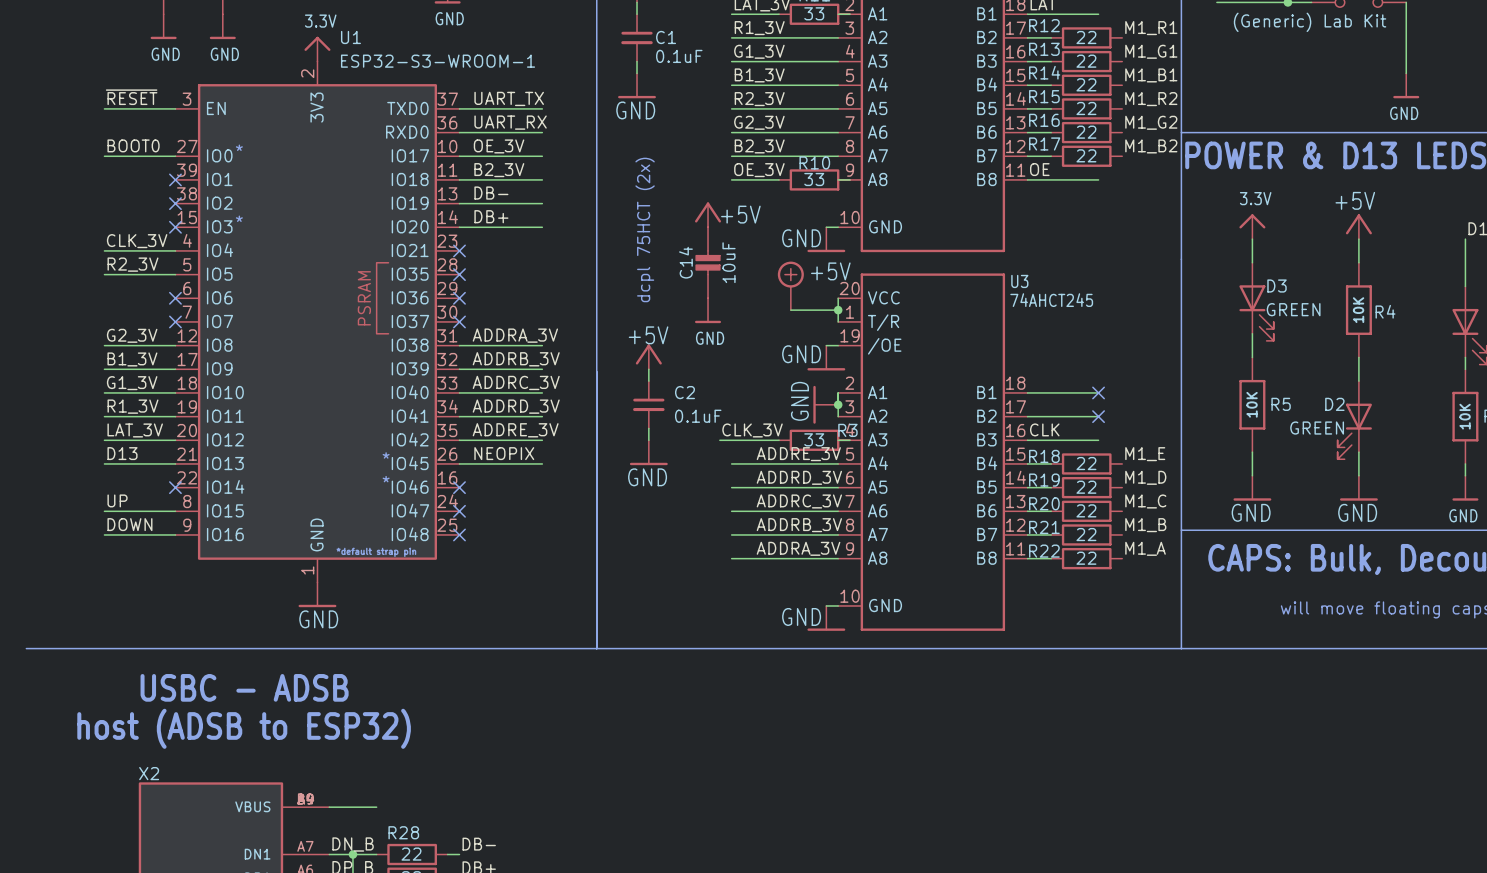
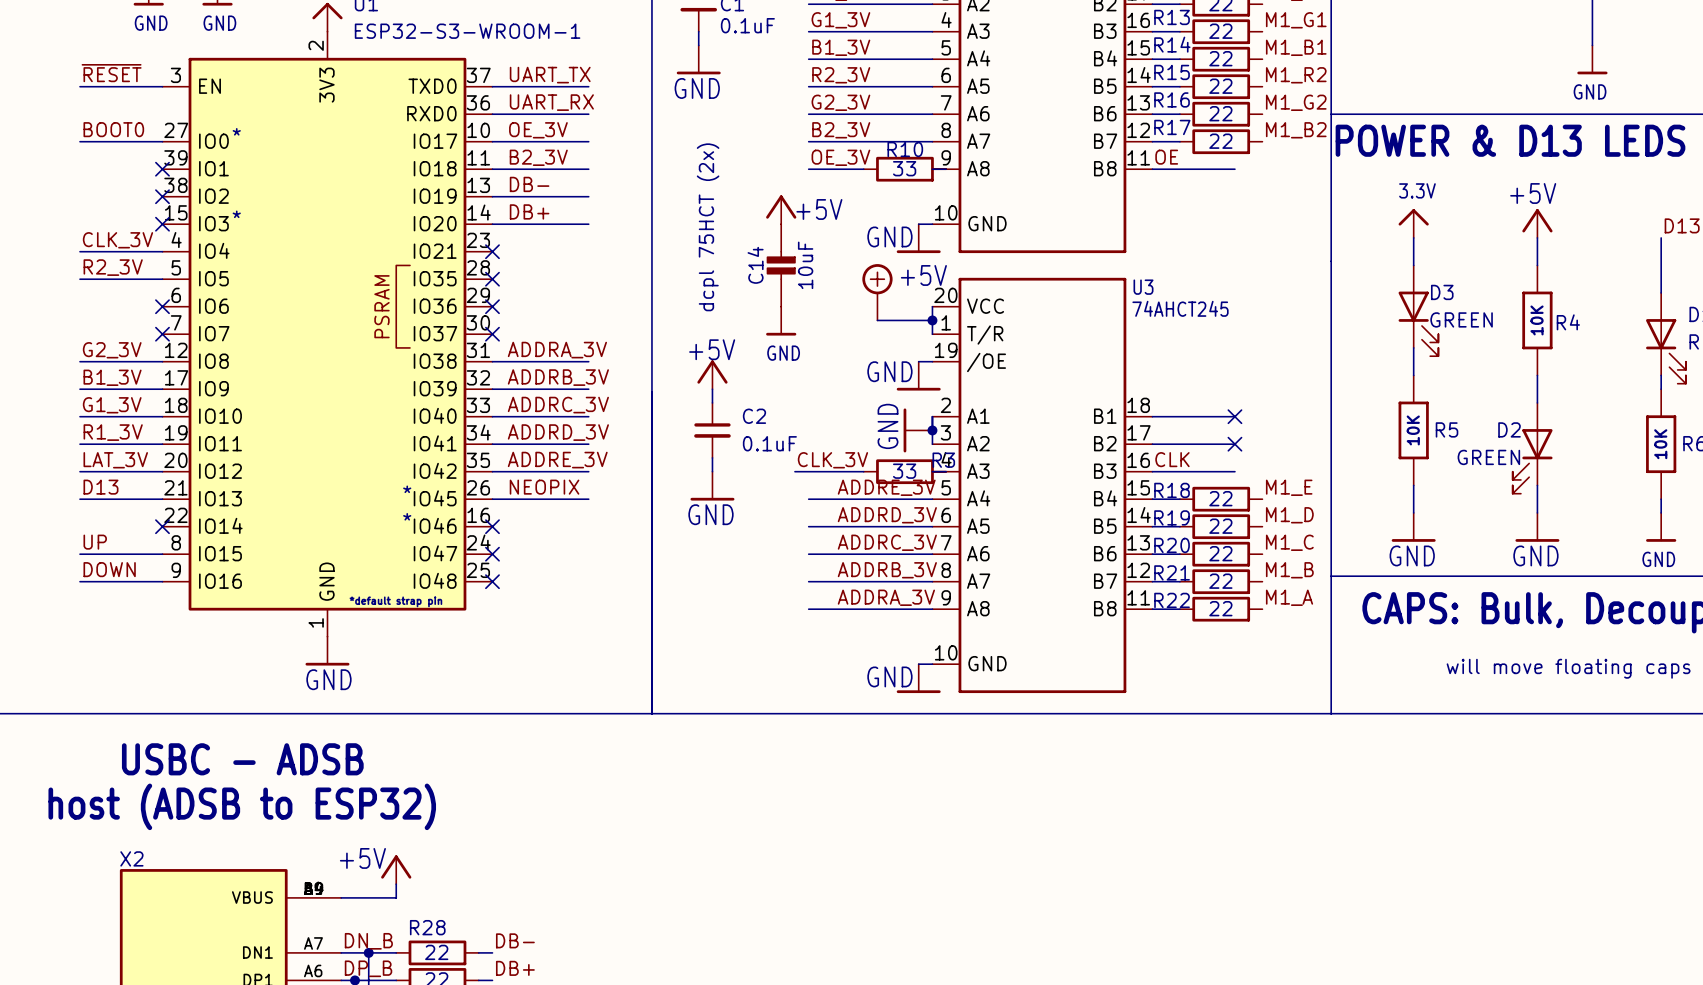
power symbol: none -> +5V (396, 869)
wire: none -> (396, 884) (396, 897)

